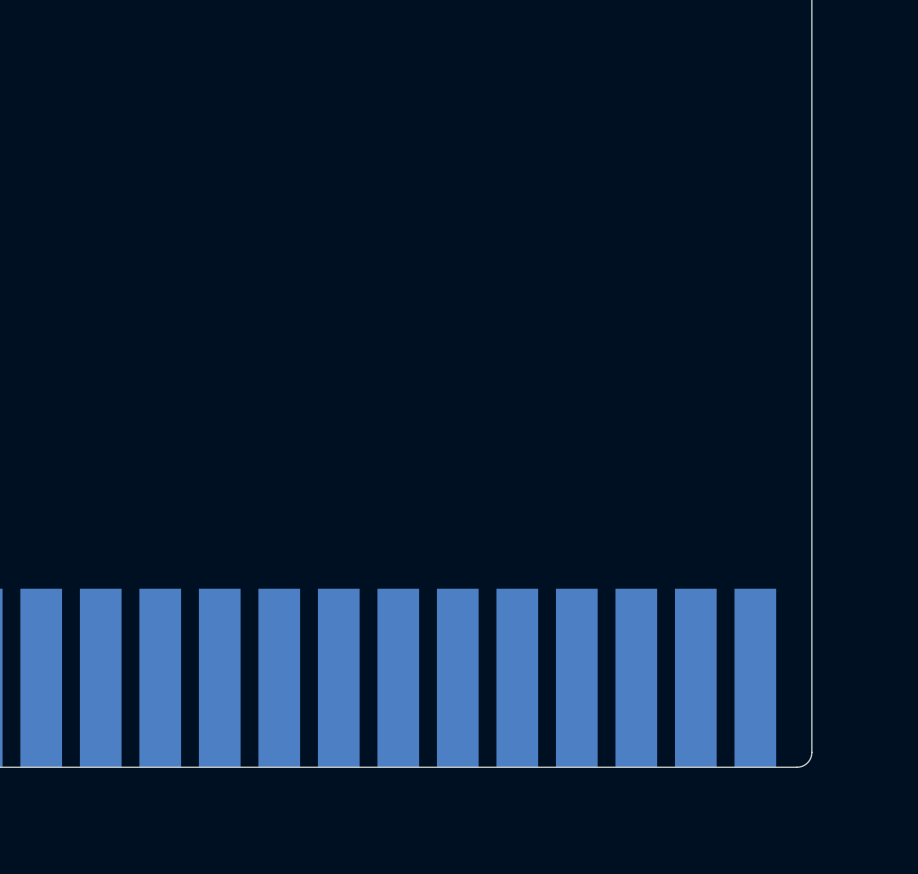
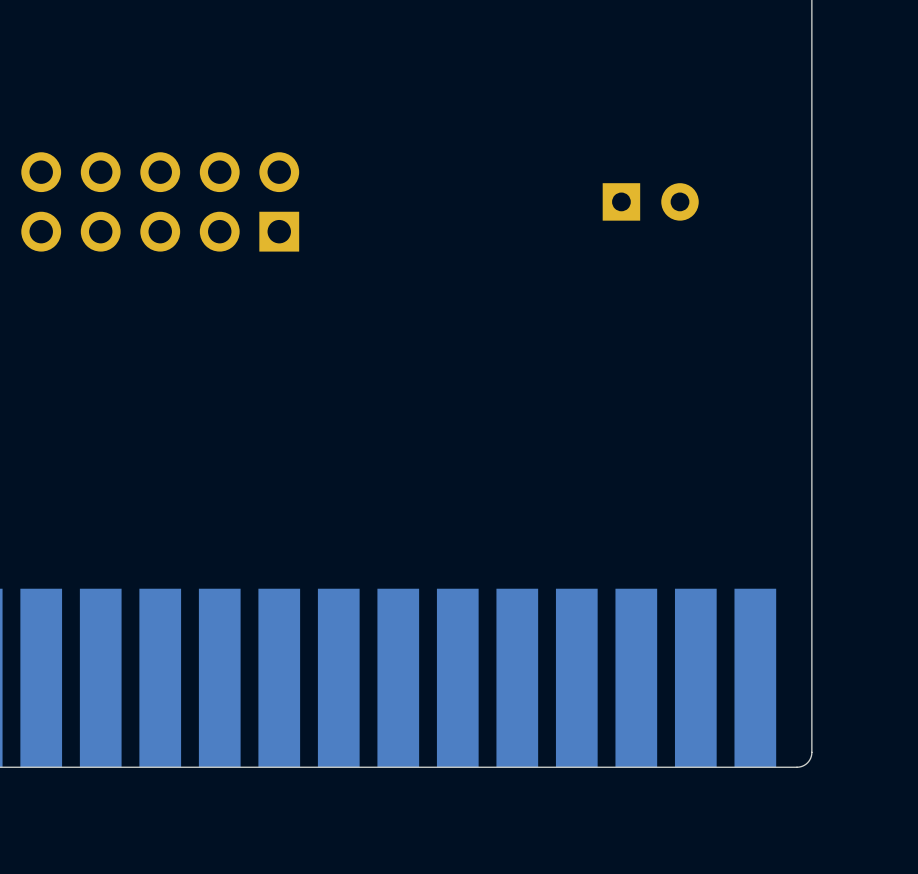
part: none -> (160, 201)
part: none -> (650, 201)

